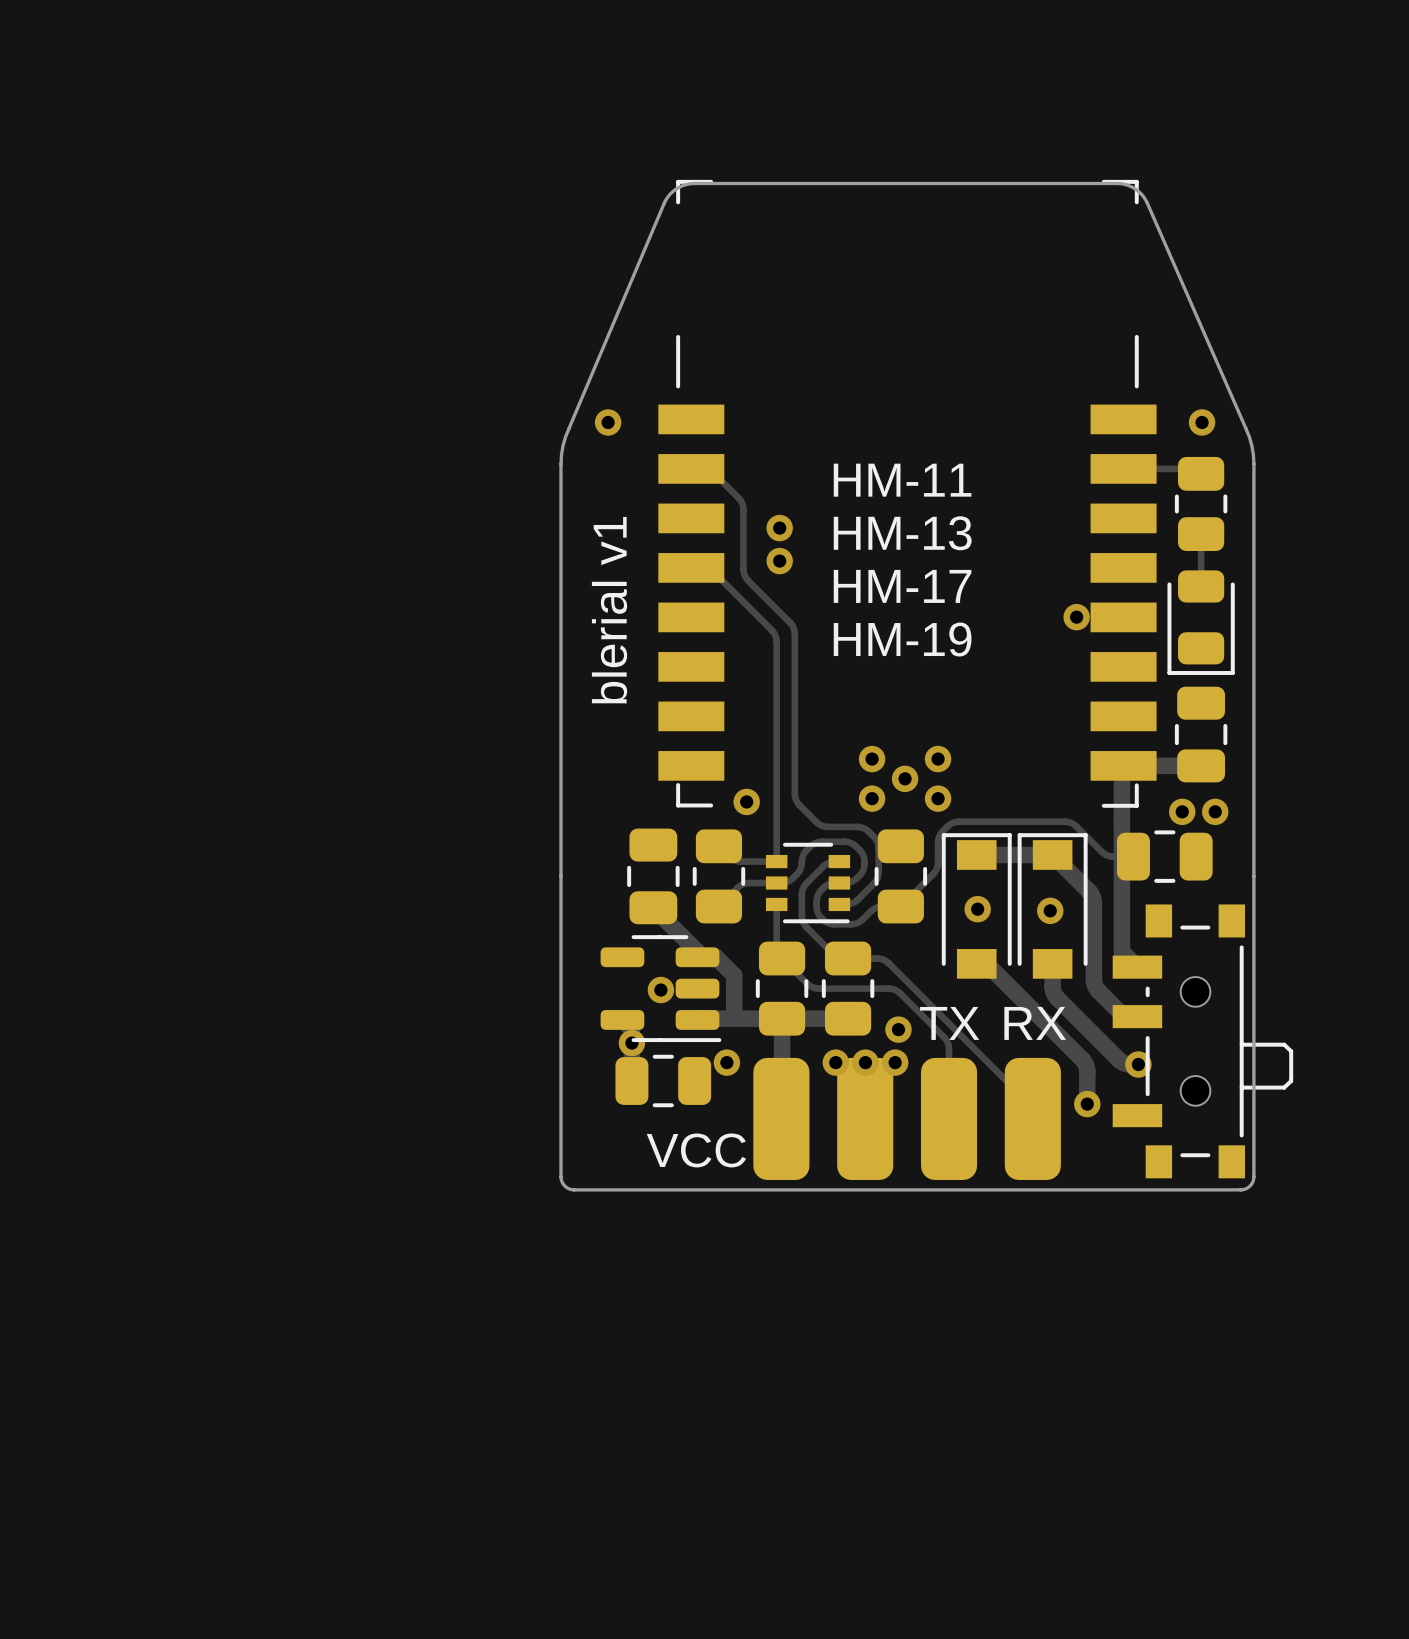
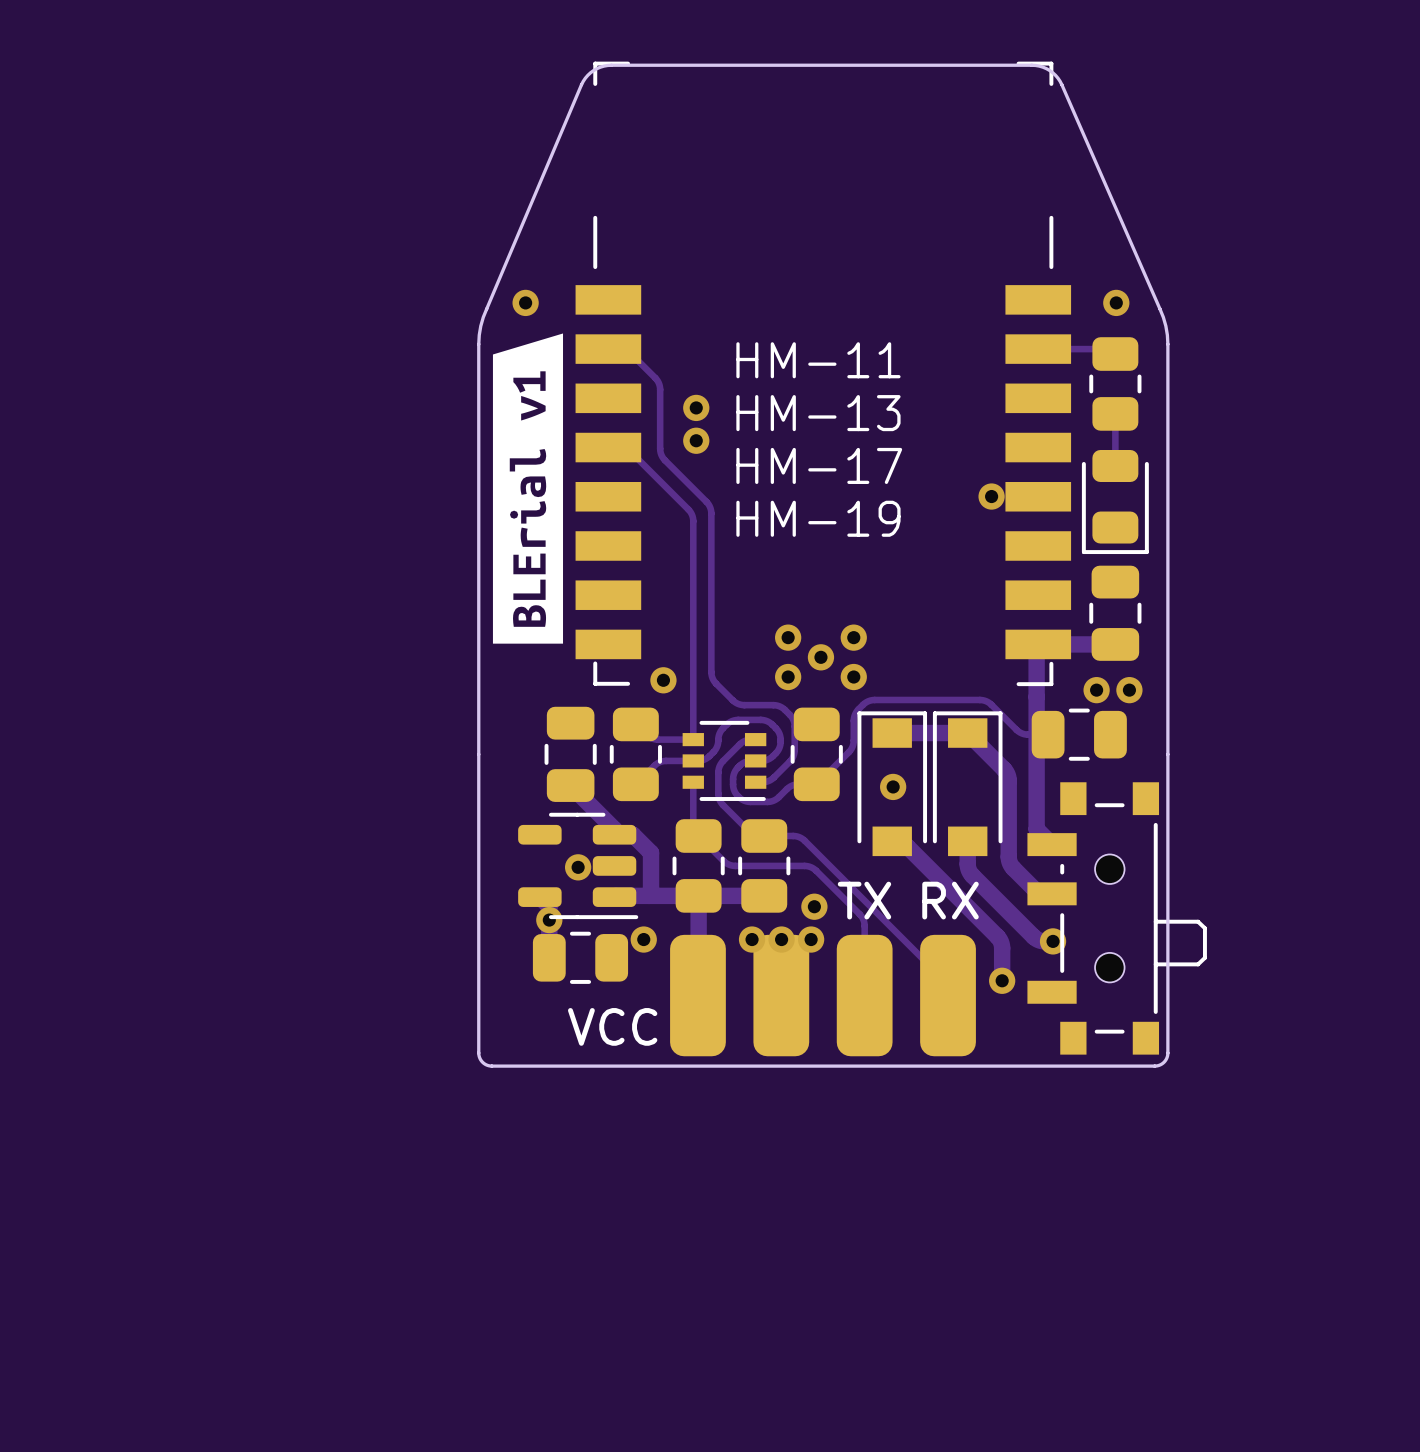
drawing: none -> [492, 333, 564, 644]
text: blerial v1 (609, 610) -> none
via: (1050, 910) -> none

